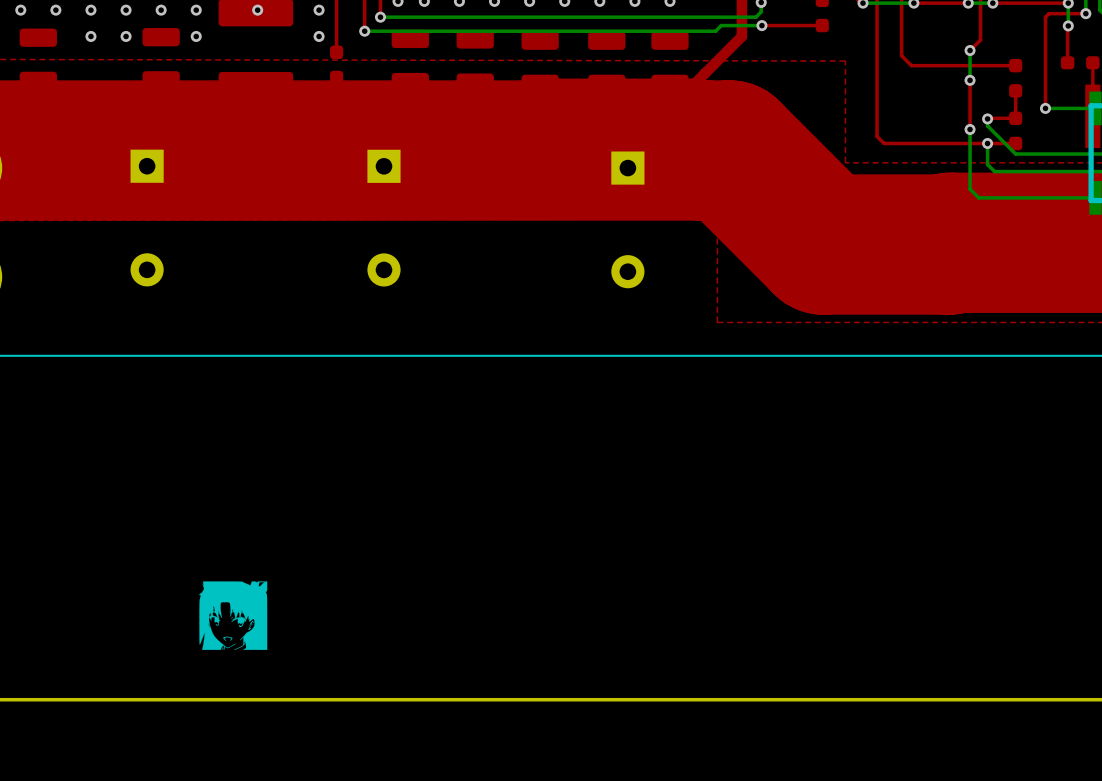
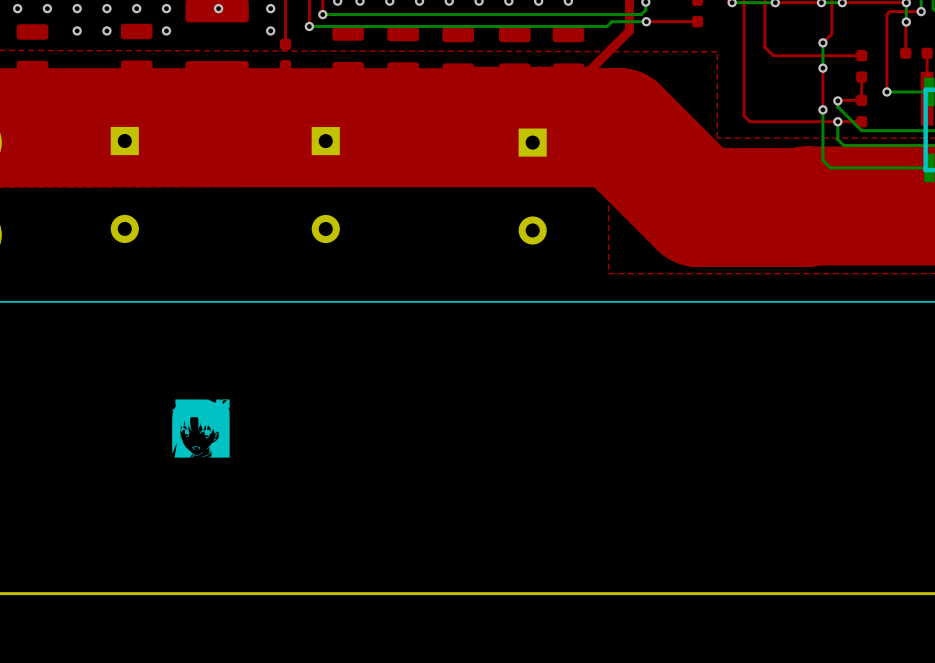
drawing position: (233, 615) -> (200, 428)

